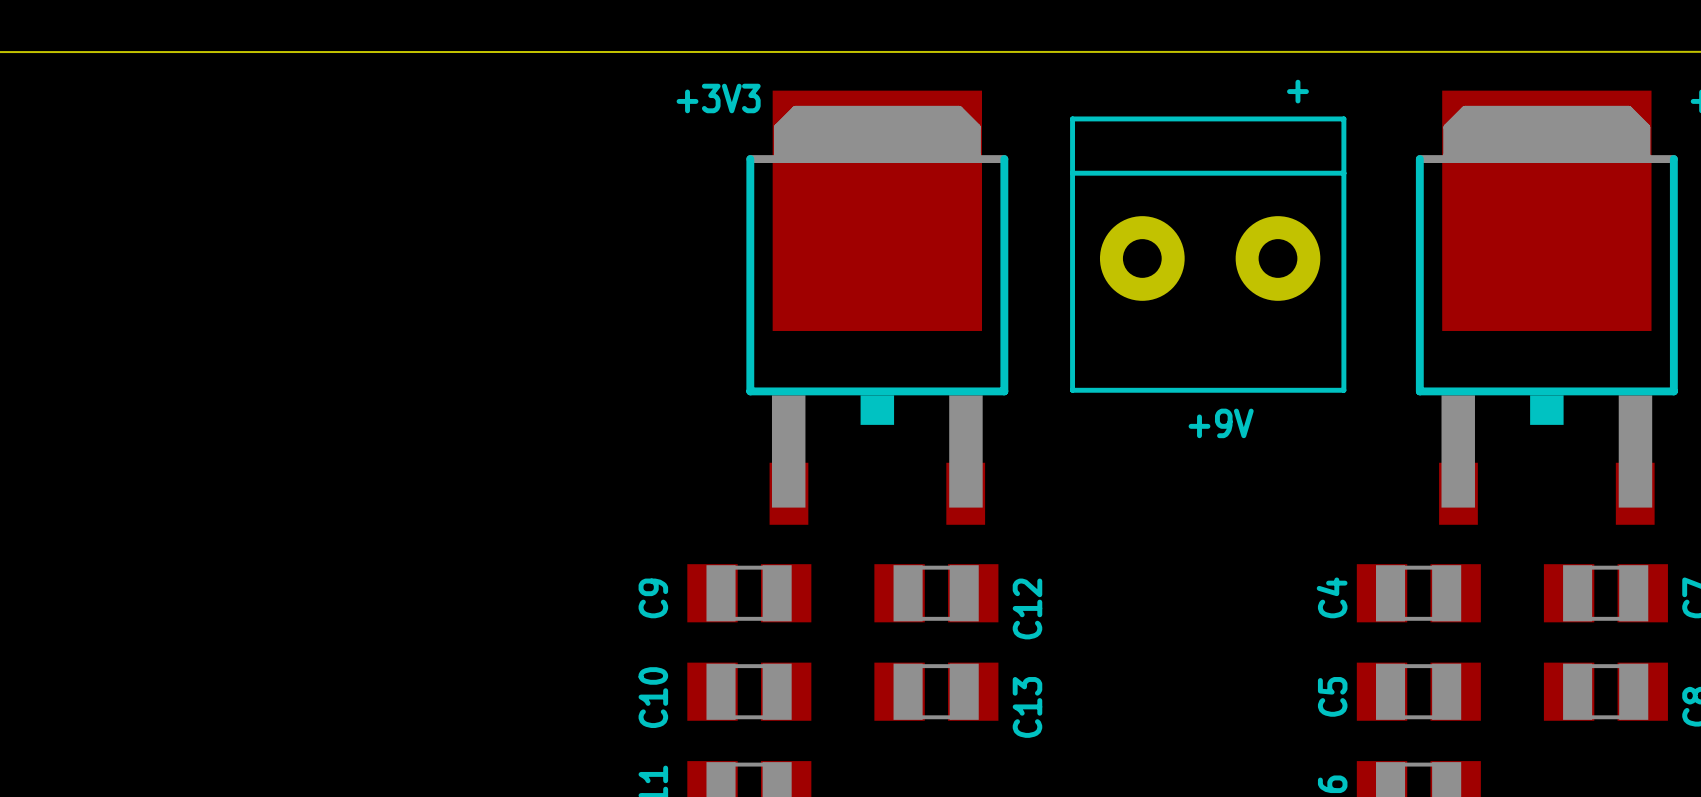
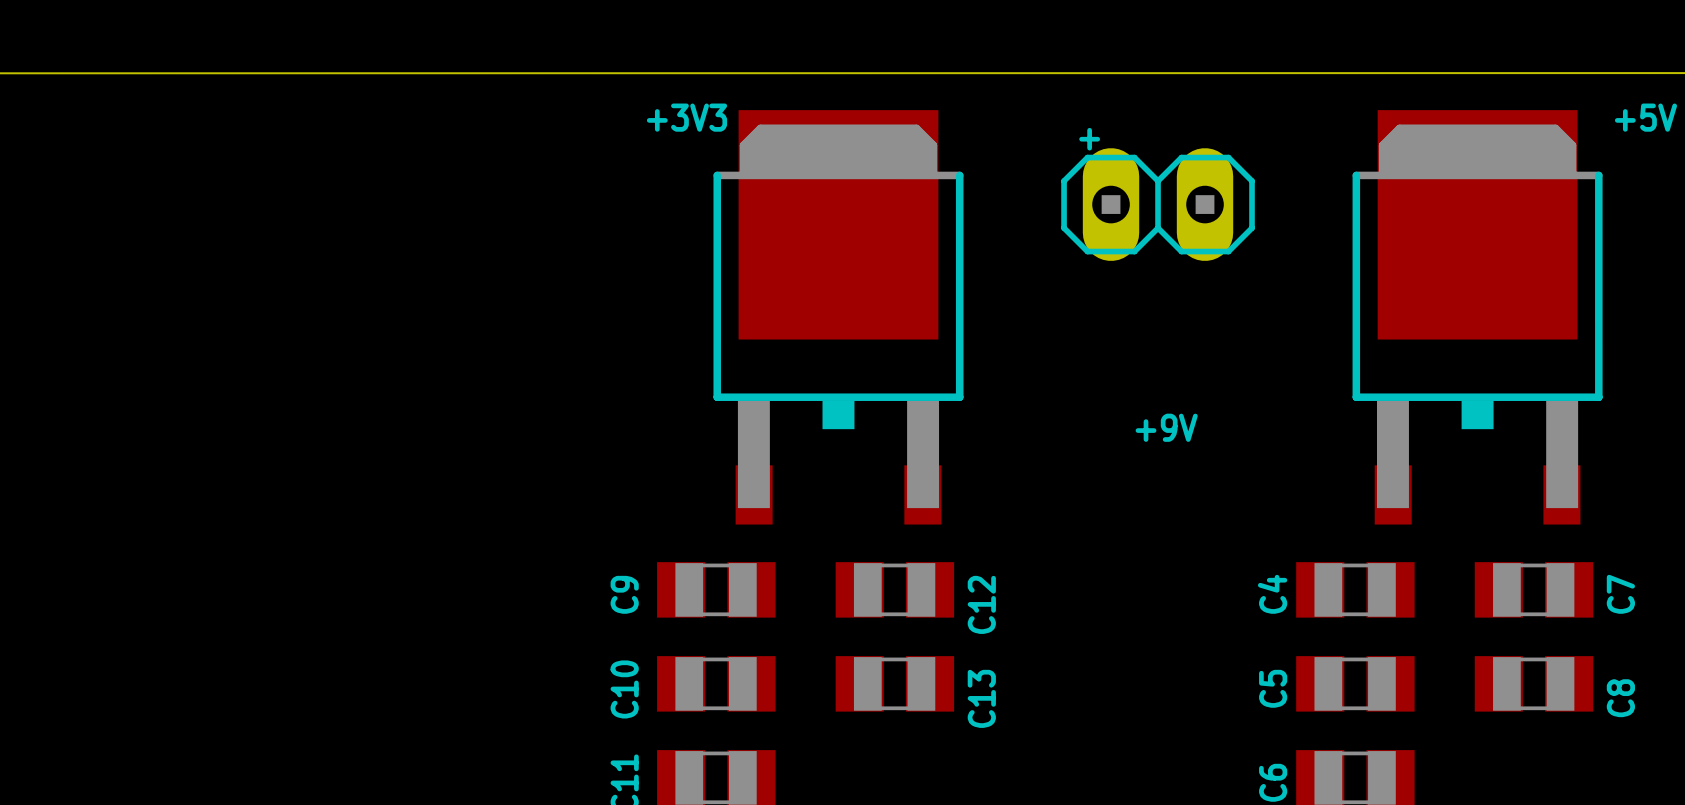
text position: + (1297, 91) -> + (1089, 139)
part: none -> (1158, 204)
part: (1208, 254) -> none

